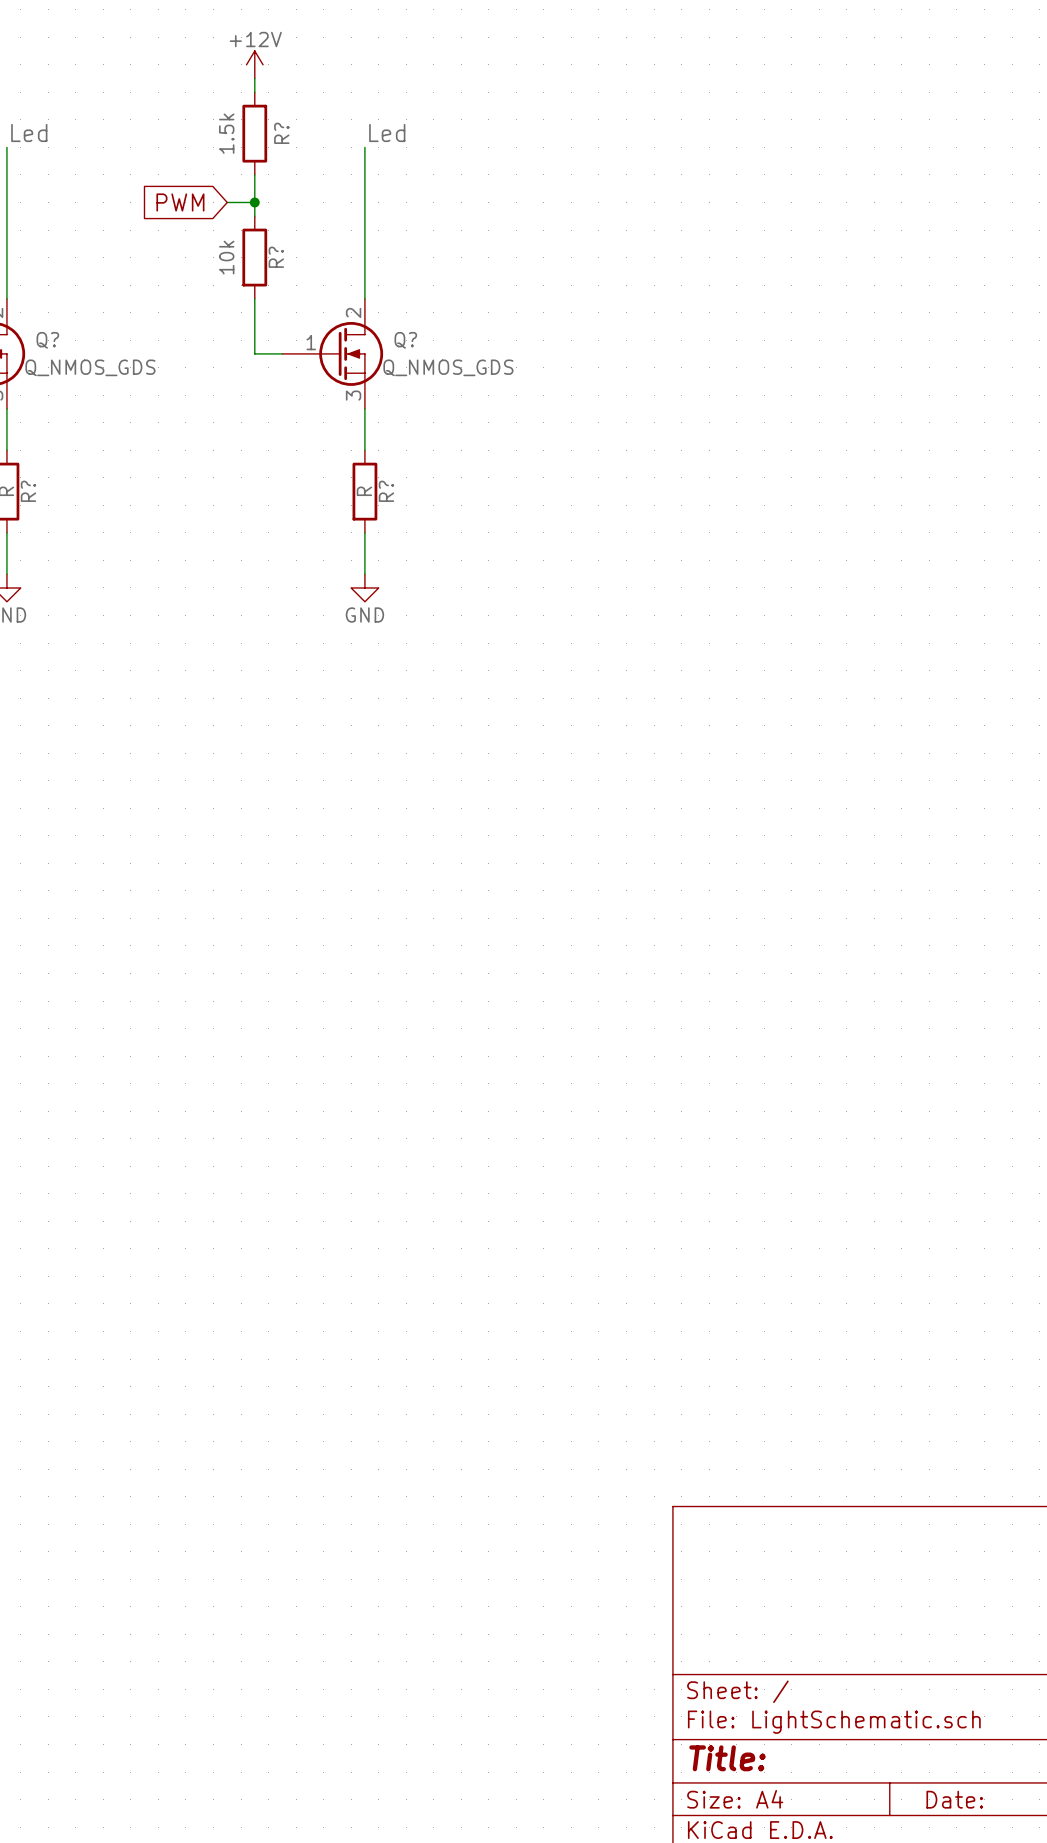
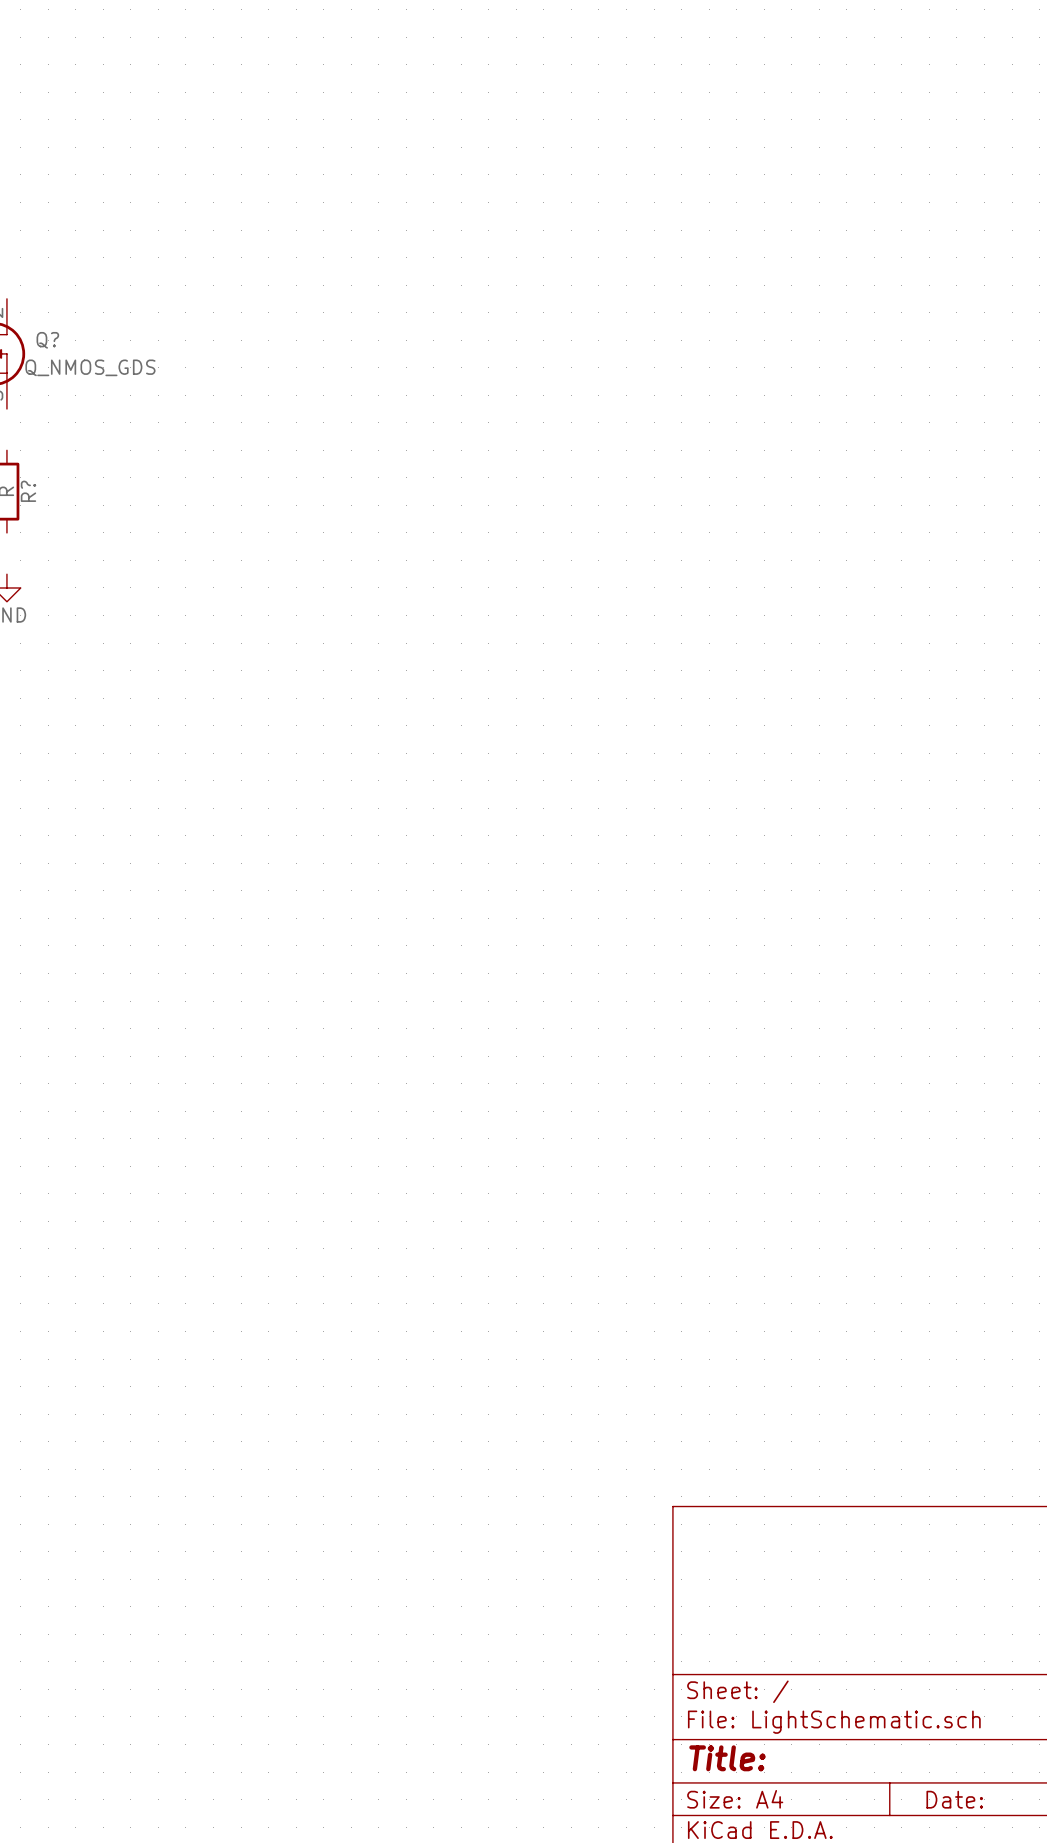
power symbol: +12V (254, 64) -> none
wire: (254, 78) (254, 92) -> none
label: Led (29, 133) -> none
R?: 1.5k (254, 133) -> none
label: Led (387, 133) -> none
wire: (6, 147) (6, 298) -> none
wire: (364, 147) (364, 298) -> none
wire: (254, 174) (254, 216) -> none
global label: PWM (180, 202) -> none
wire: (227, 202) (254, 202) -> none
junction: (254, 202) -> none
R?: 10k (254, 257) -> none
wire: (254, 298) (254, 353) (282, 353) -> none
Q?: Q_NMOS_GDS (332, 353) -> none
wire: (6, 409) (6, 450) -> none
wire: (364, 409) (364, 450) -> none
R?: R (364, 491) -> none
wire: (6, 532) (6, 574) -> none
wire: (364, 532) (364, 574) -> none
power symbol: GND (364, 587) -> none

